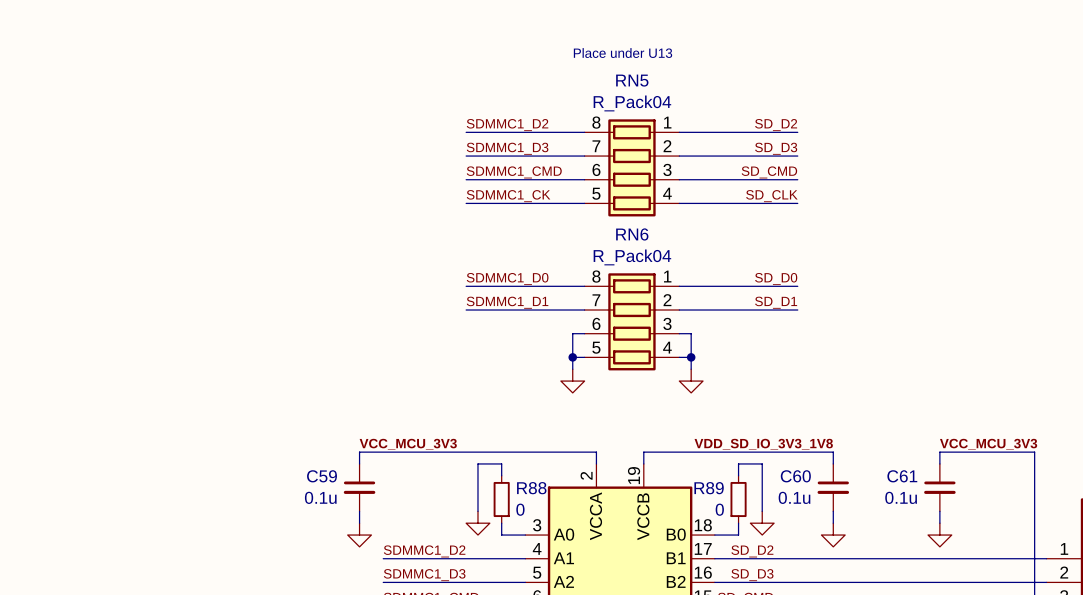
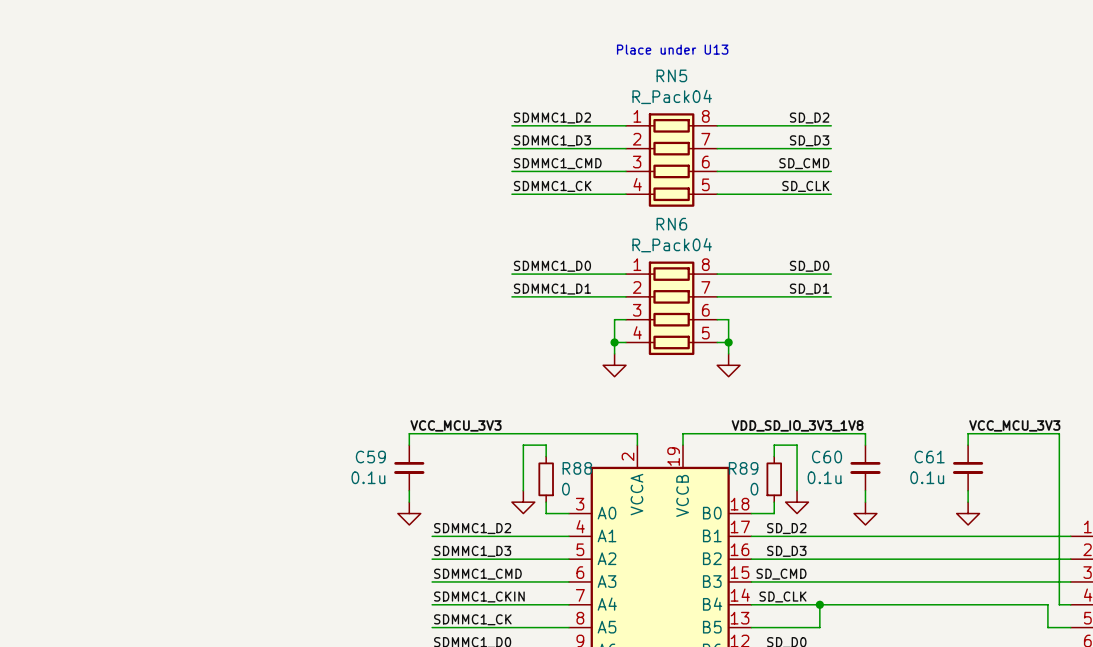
RN5 flip: as is (631, 167) -> left-right (671, 160)
RN6 flip: as is (631, 321) -> left-right (671, 308)

